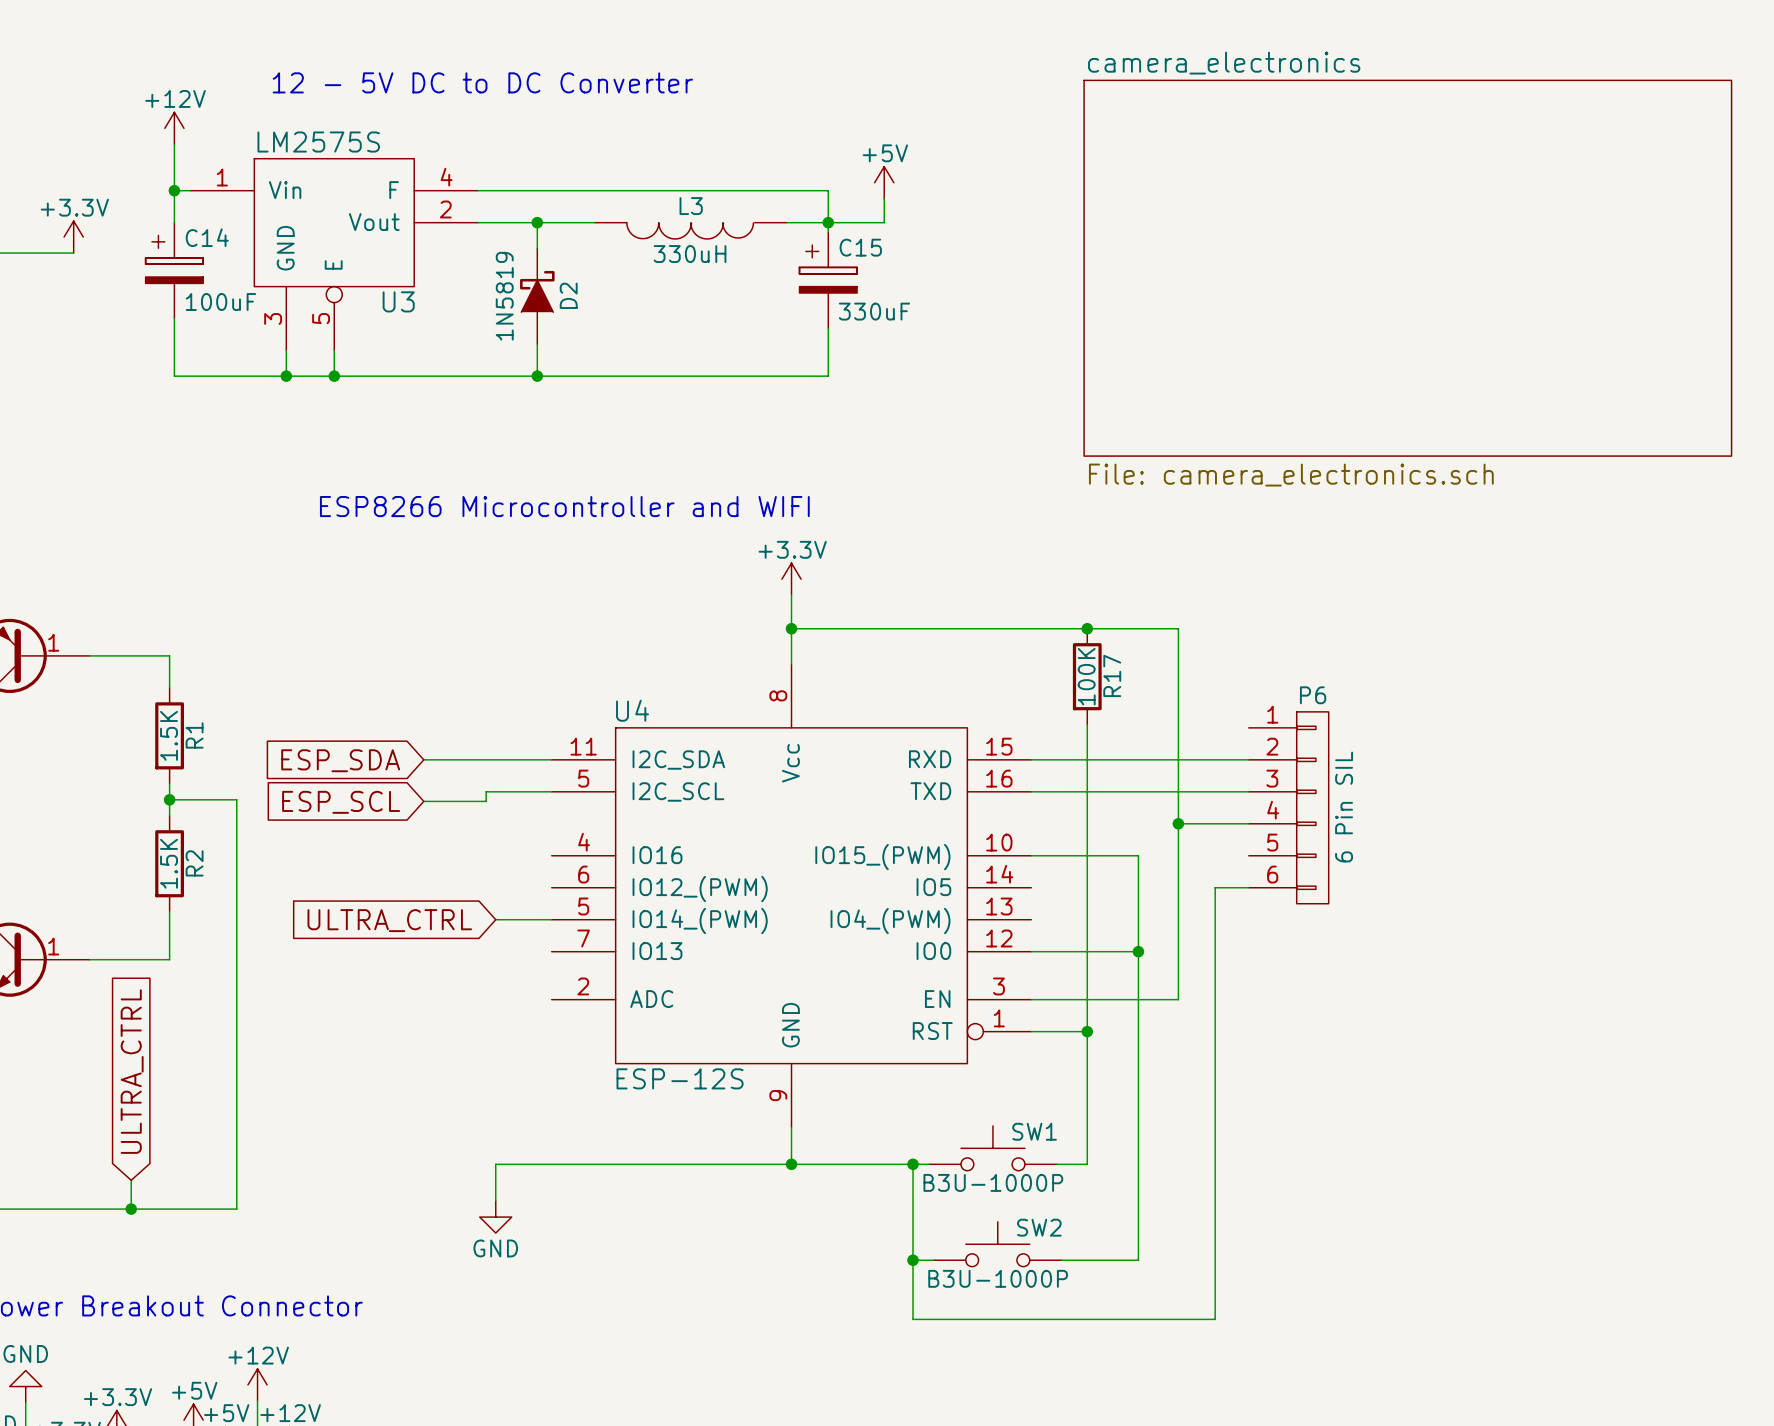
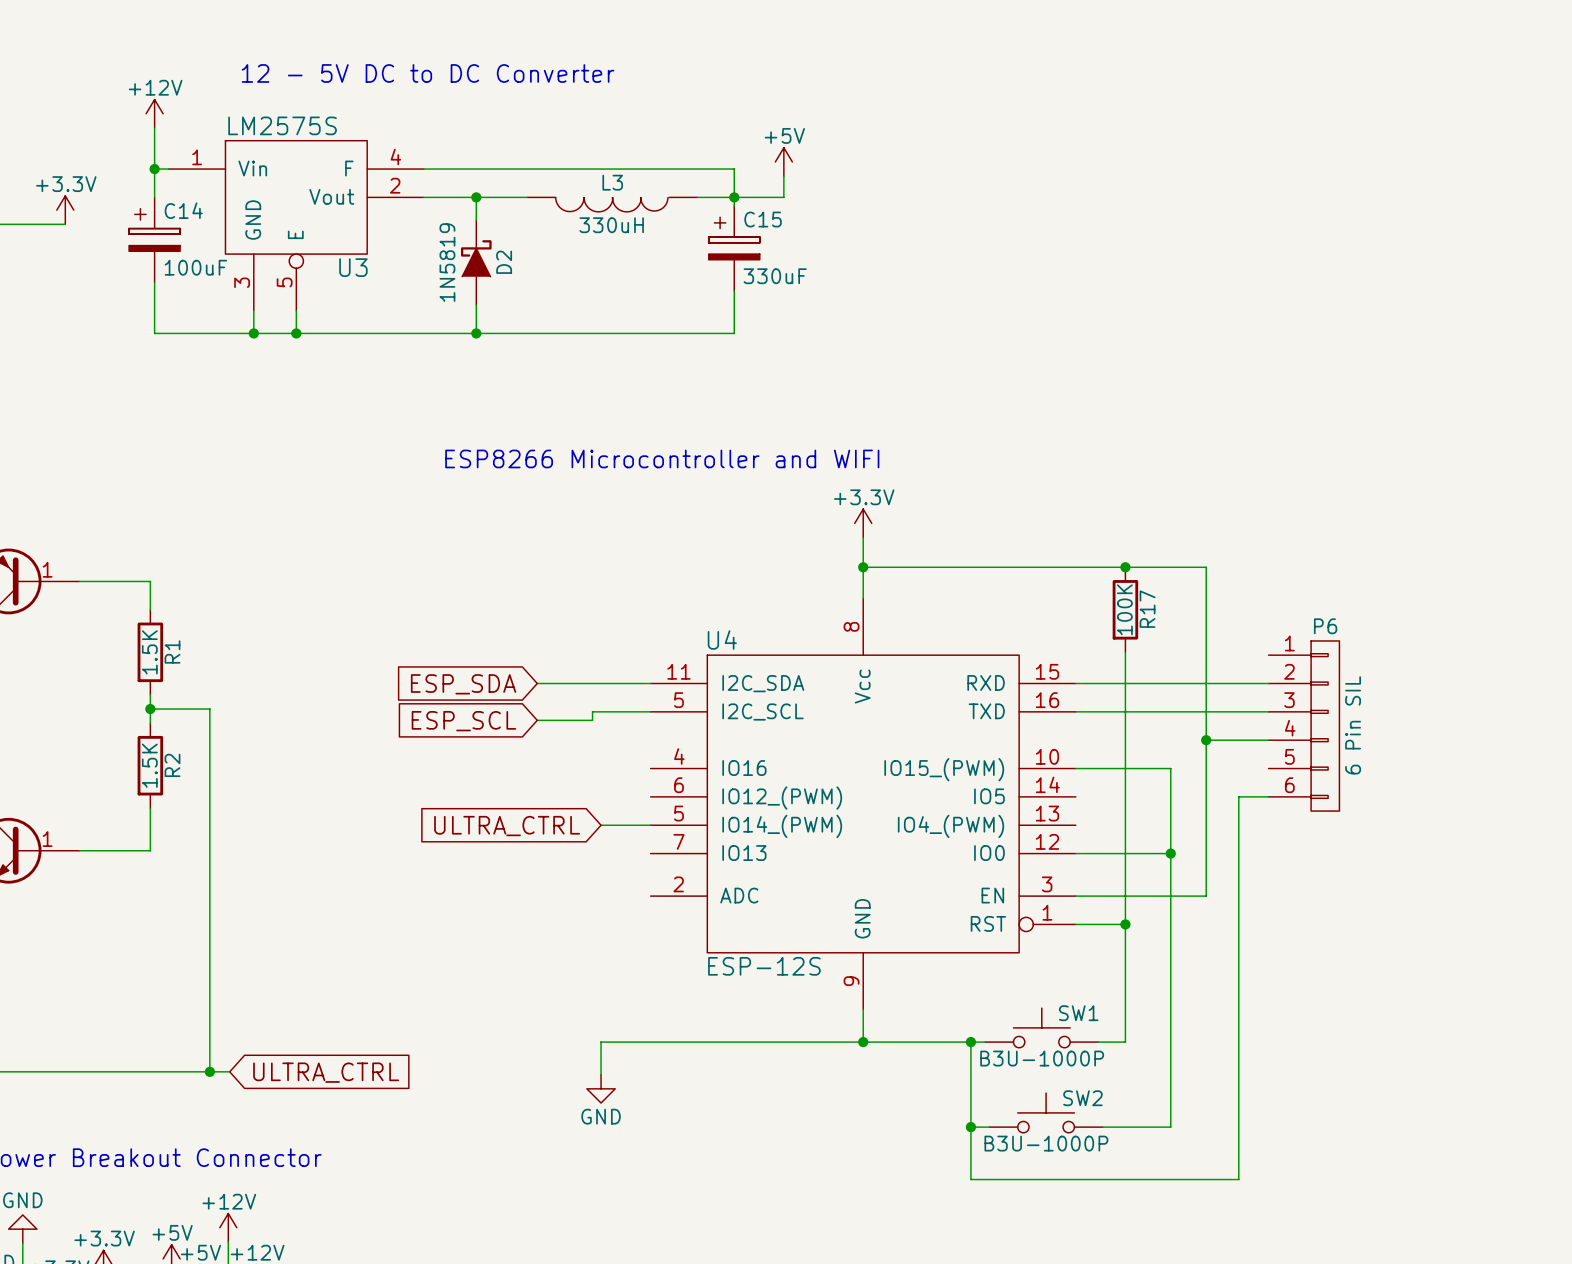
sheet camera_electronics: File: camera_electronics.sch (1407, 268) -> none
text position: ESP8266 Microcontroller and WIFI (564, 506) -> ESP8266 Microcontroller and WIFI (662, 458)
power symbol position: +3.3V (791, 579) -> +3.3V (863, 523)
wire: (791, 595) (791, 663) -> (863, 537) (863, 598)
wire: (791, 628) (1178, 628) (1178, 999) (1031, 999) -> (863, 567) (1206, 567) (1206, 896) (1075, 896)
junction: (791, 628) -> none
junction: (1087, 628) -> none
junction: none -> (863, 567)
junction: none -> (1125, 567)
R17 position: (1087, 676) -> (1125, 609)
wire: (1087, 724) (1087, 1164) (1056, 1164) -> (1125, 652) (1125, 1042) (1098, 1042)
wire: (423, 759) (551, 759) -> (537, 683) (650, 683)
wire: (1031, 759) (1248, 759) -> (1075, 683) (1268, 683)
global label position: ESP_SDA (340, 760) -> ESP_SDA (463, 684)
wire: (551, 791) (486, 791) (486, 801) (423, 801) -> (650, 711) (592, 711) (592, 720) (537, 720)
wire: (1031, 791) (1248, 791) -> (1075, 711) (1268, 711)
global label position: ESP_SCL (341, 802) -> ESP_SCL (463, 721)
P6 position: (1288, 807) -> (1303, 726)
wire: (1178, 823) (1248, 823) -> (1206, 740) (1268, 740)
junction: (1178, 823) -> none
junction: none -> (1206, 740)
wire: (1031, 855) (1138, 855) (1138, 1260) (1061, 1260) -> (1075, 768) (1170, 768) (1170, 1127) (1102, 1127)
wire: (1248, 887) (1215, 887) (1215, 1319) (913, 1319) (913, 1164) -> (1268, 796) (1238, 796) (1238, 1179) (970, 1179) (970, 1042)
U4 position: (791, 895) -> (863, 803)
wire: (495, 919) (551, 919) -> (601, 825) (650, 825)
global label position: ULTRA_CTRL (389, 920) -> ULTRA_CTRL (507, 826)
wire: (1031, 951) (1138, 951) -> (1075, 853) (1170, 853)
junction: (1138, 951) -> none
junction: none -> (1170, 853)
wire: (1031, 1031) (1087, 1031) -> (1075, 924) (1125, 924)
junction: (1087, 1031) -> none
junction: none -> (1125, 924)
global label rotation: 0° (132, 1071) -> 90° clockwise (326, 1072)
global label position: ULTRA_CTRL (132, 1071) -> ULTRA_CTRL (326, 1072)
wire: (791, 1127) (791, 1164) -> (863, 1009) (863, 1042)
SW1 position: (992, 1148) -> (1041, 1027)
junction: (791, 1164) -> none
junction: (913, 1164) -> none
wire: (929, 1164) (495, 1164) (495, 1201) -> (985, 1042) (601, 1042) (601, 1074)
junction: none -> (863, 1042)
junction: none -> (970, 1042)
wire: (131, 1180) (131, 1209) -> none
junction: (131, 1209) -> none
wire: none -> (209, 1071) (229, 1071)
junction: none -> (209, 1071)
power symbol position: GND (495, 1217) -> GND (601, 1088)
SW2 position: (997, 1244) -> (1046, 1112)
wire: (913, 1260) (933, 1260) -> (970, 1127) (989, 1127)
junction: (913, 1260) -> none
junction: none -> (970, 1127)

